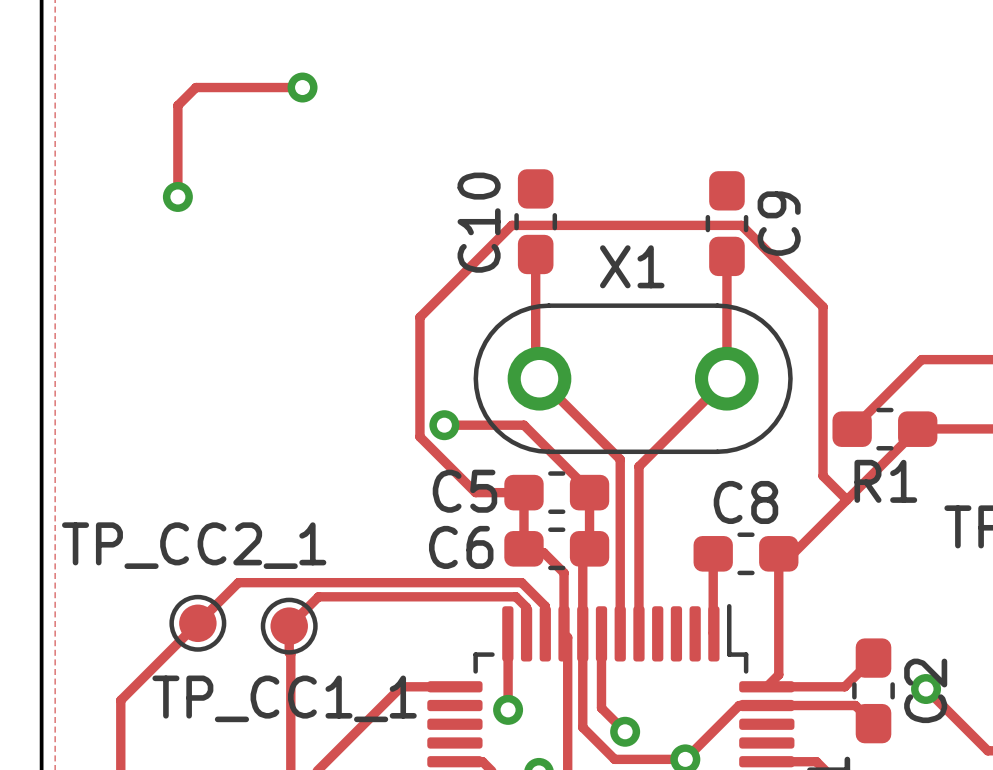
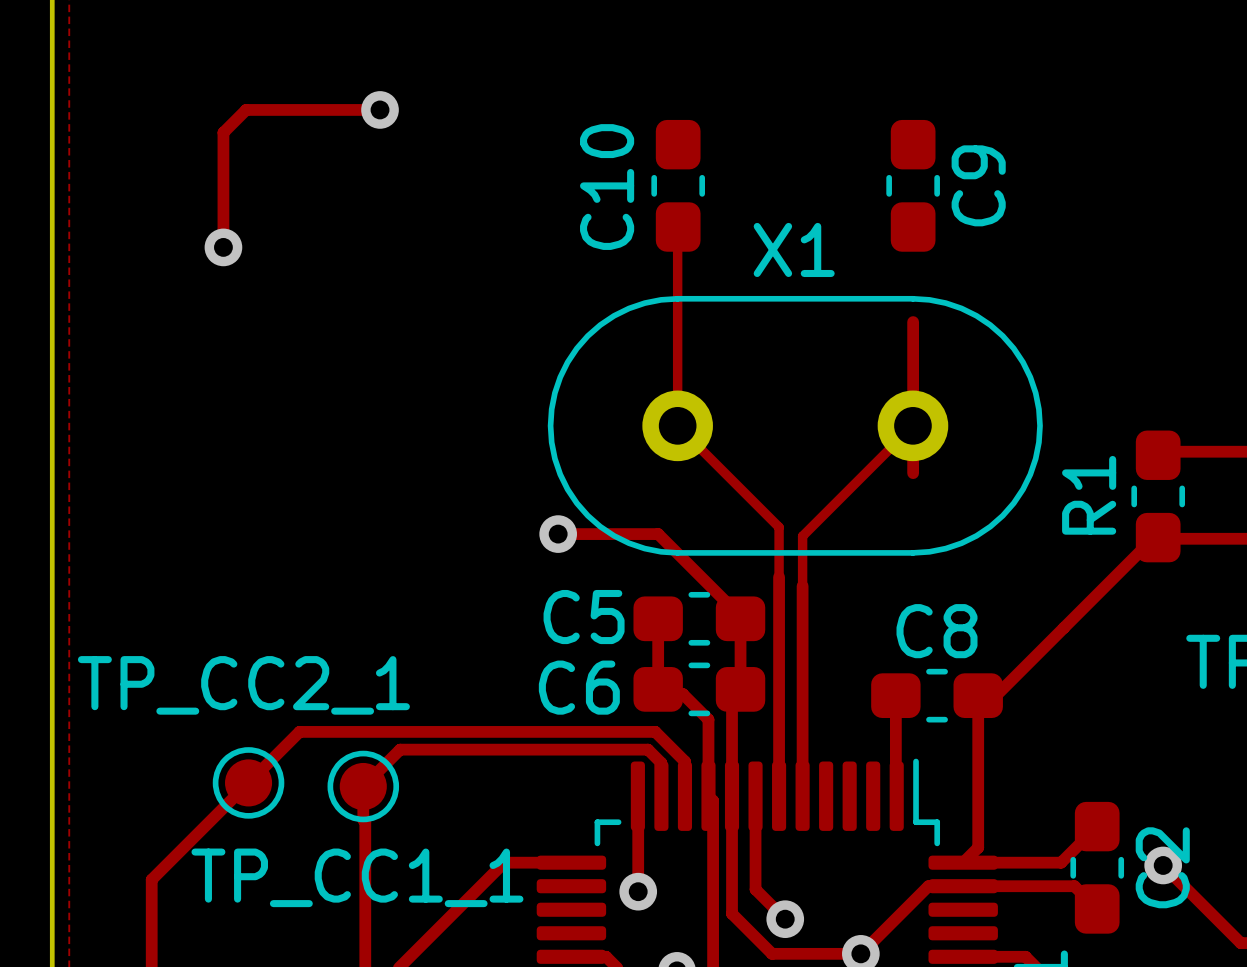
C10 position: (535, 221) -> (678, 185)
C9 position: (726, 223) -> (913, 185)
track: (535, 254) (535, 378) (540, 379) -> none
X1 footprint: [473, 303, 793, 455] -> [547, 295, 1043, 556]
track: (921, 359) (852, 429) -> none
track: (539, 378) (620, 459) -> (677, 227) (677, 425) (779, 527) (779, 577)
track: (726, 378) (638, 466) -> (912, 425) (802, 536) (802, 586)
R1 rotation: 0° (884, 429) -> 90° clockwise (1158, 496)
track: (523, 492) (475, 492) (419, 436) (419, 317) (511, 225) (741, 225) (823, 306) (823, 476) (846, 499) -> none

